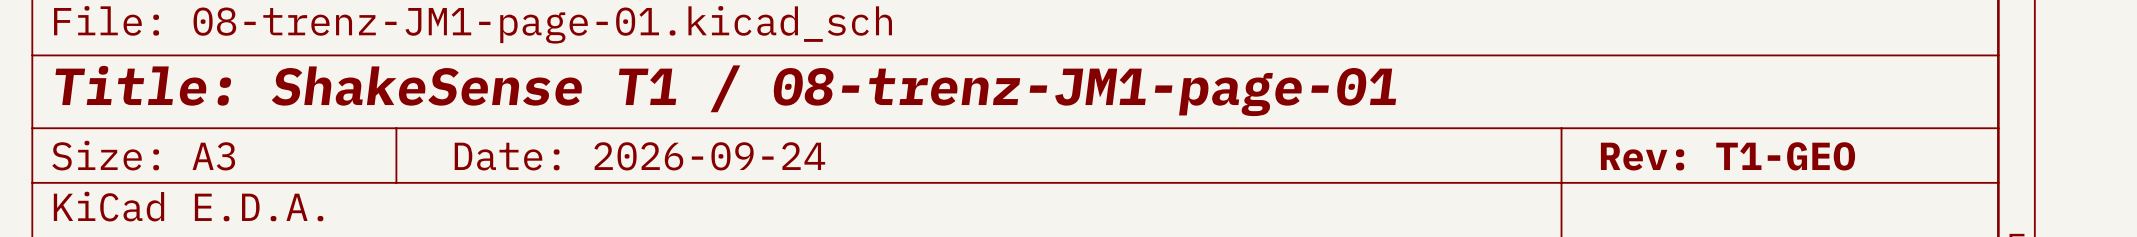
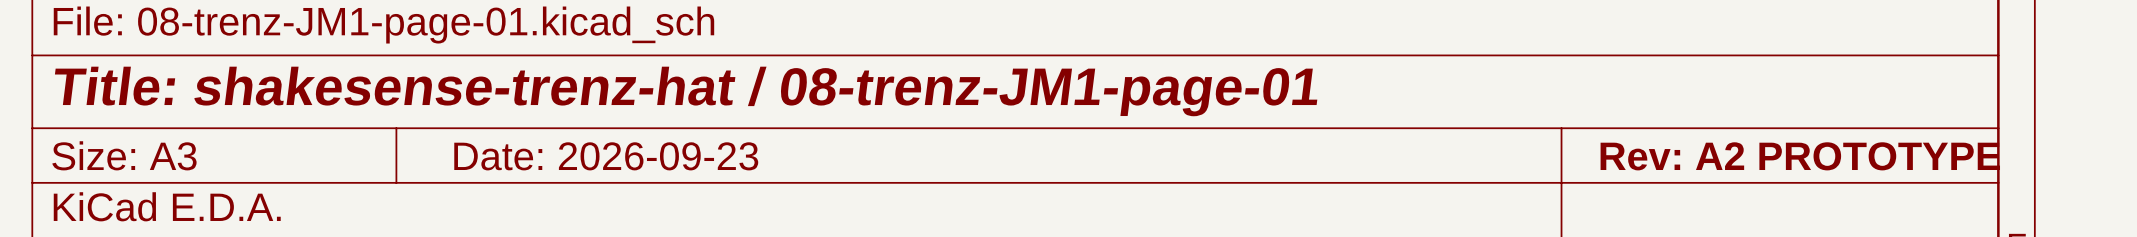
title block: Title: ShakeSense T1 / 08-trenz-JM1-page-01 (725, 90) -> Title: shakesense-trenz-hat / 08-trenz-JM1-page-01 (686, 91)
title block: Date: 2026-09-24 (639, 156) -> Date: 2026-09-23 (606, 156)
title block: Rev: T1-GEO (1727, 156) -> Rev: A2 PROTOTYPE (1800, 156)

